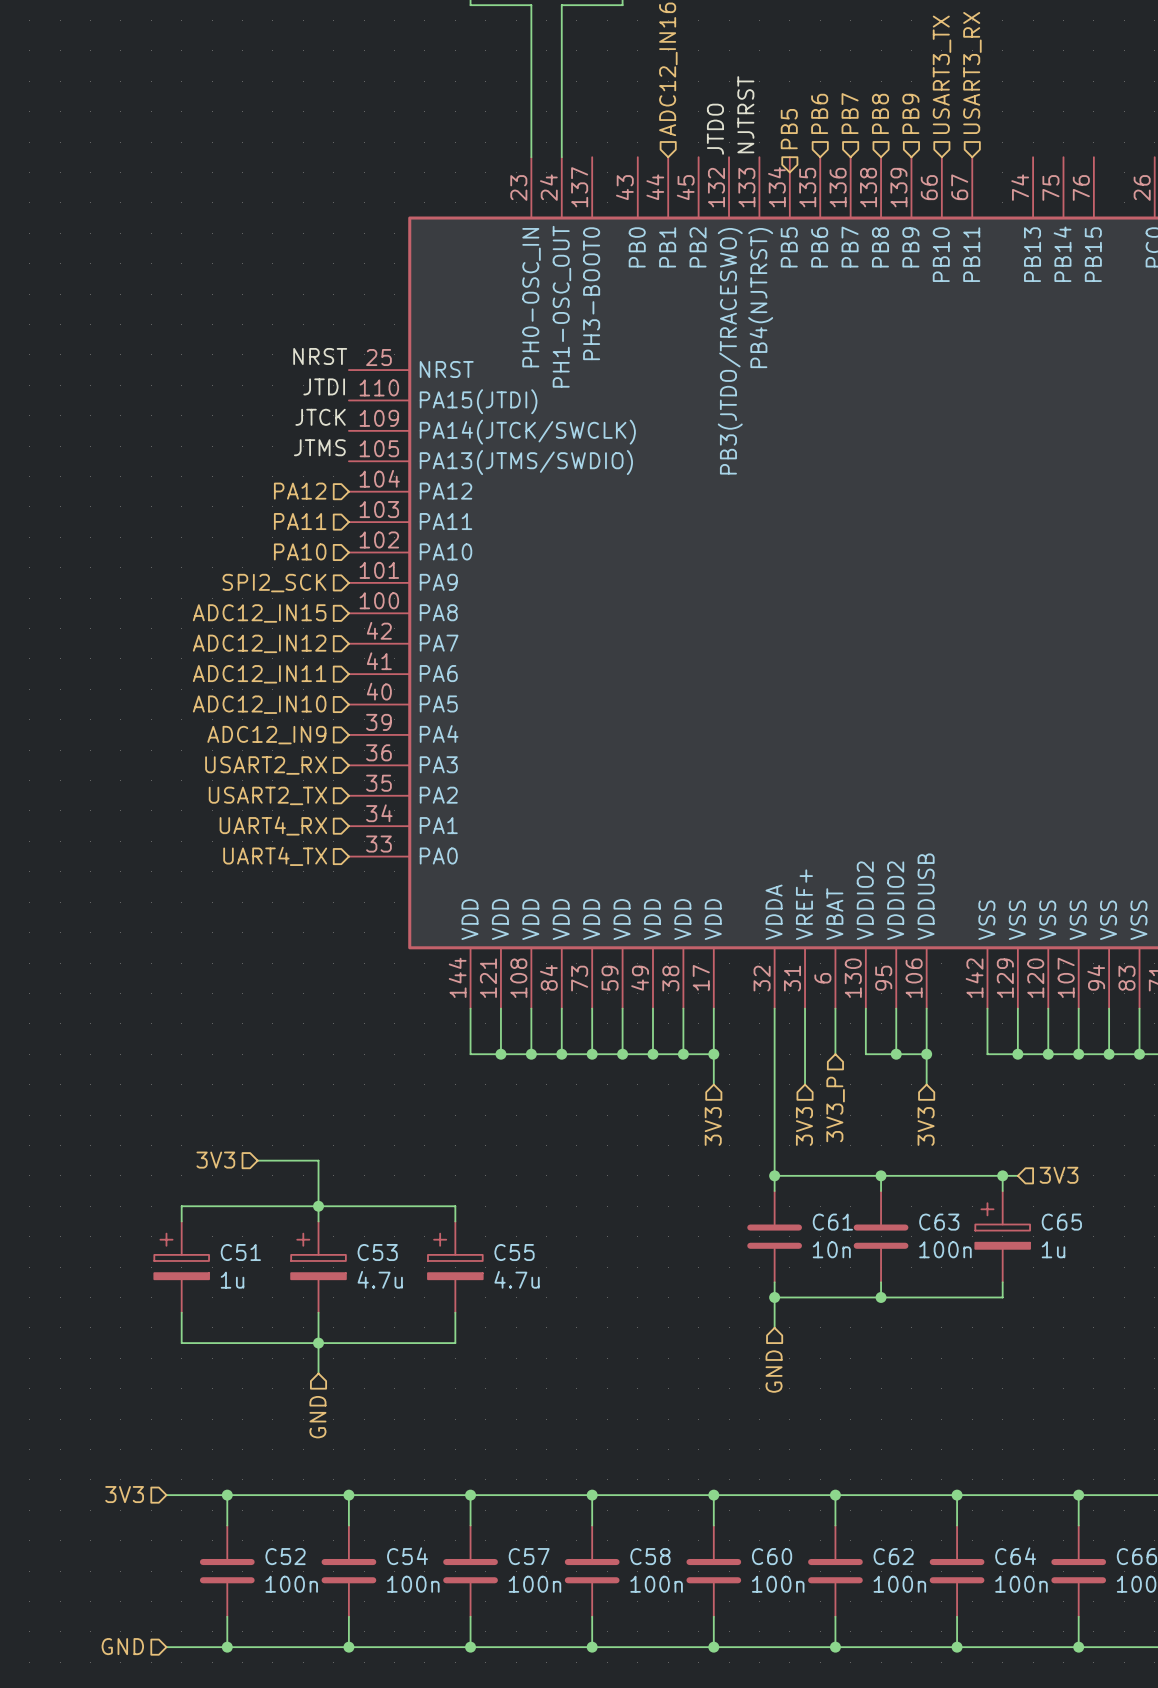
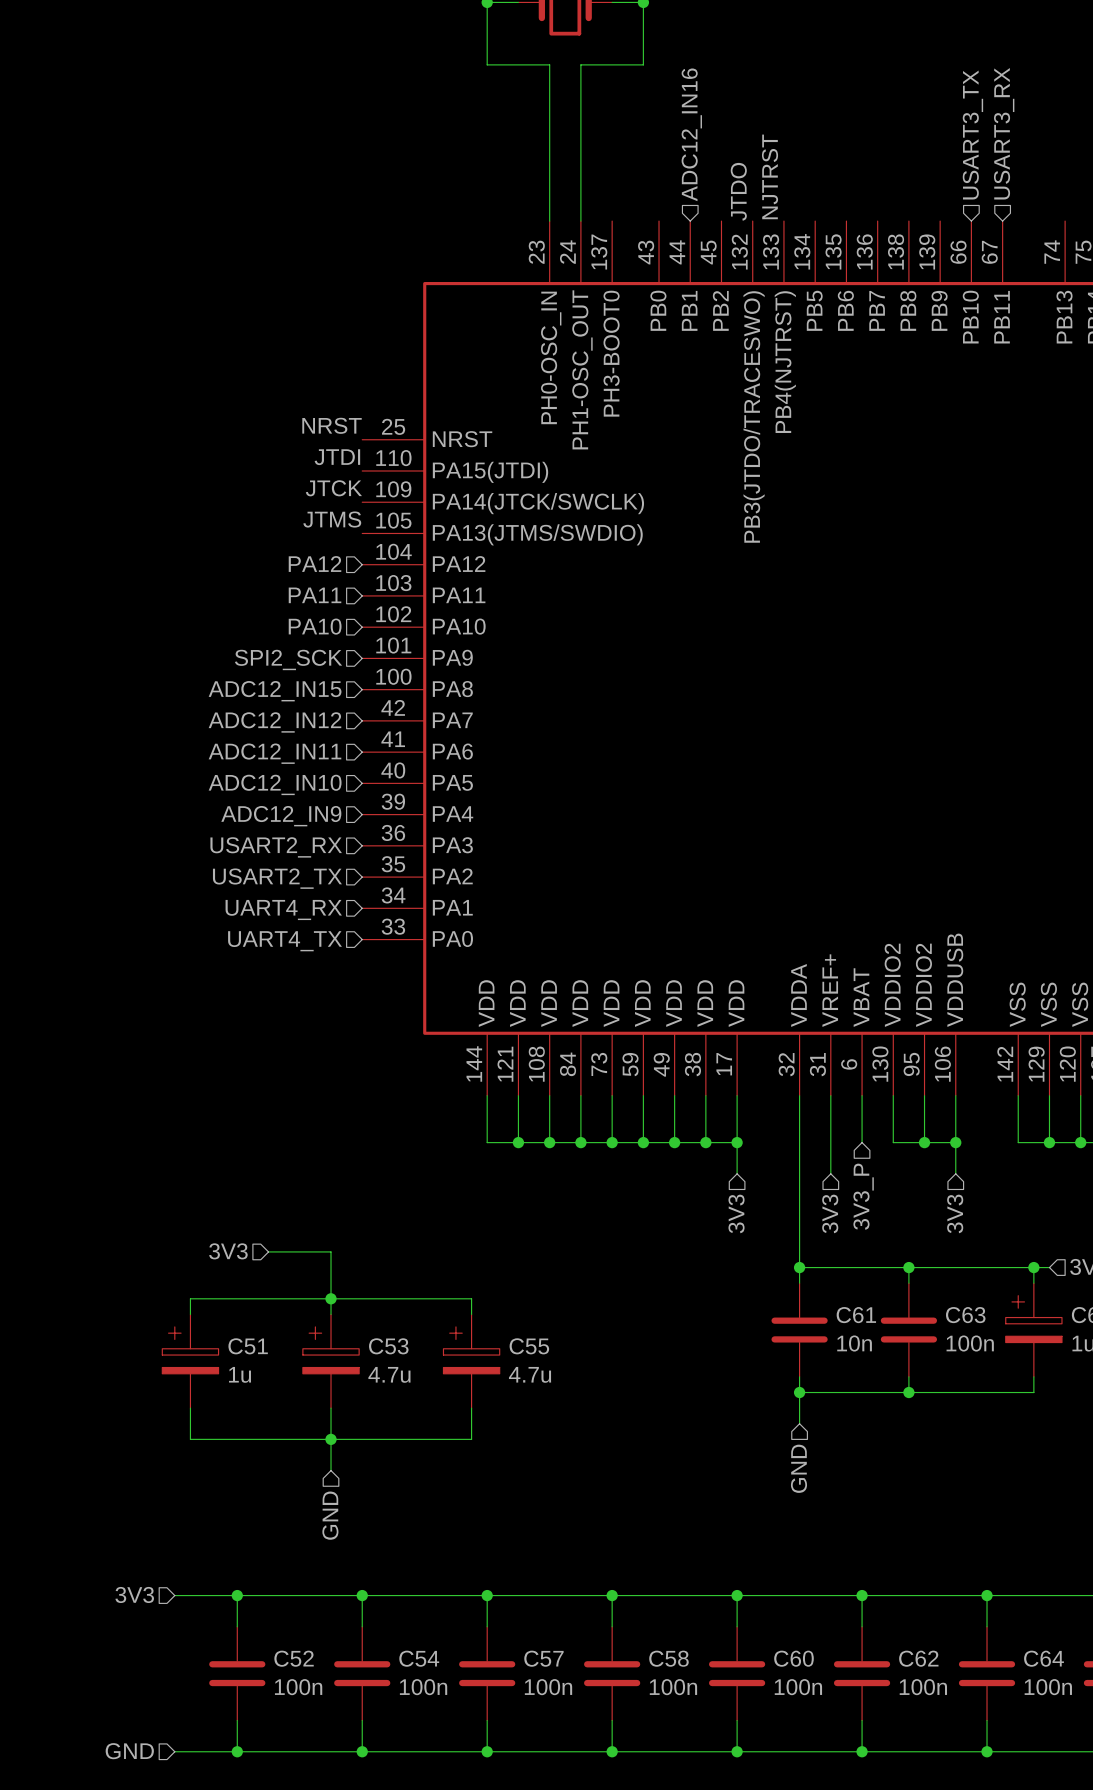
hierarchical label: PB6 (819, 113) -> none
hierarchical label: PB7 (850, 113) -> none
hierarchical label: PB8 (880, 113) -> none
hierarchical label: PB9 (910, 113) -> none
hierarchical label: PB5 (789, 129) -> none

